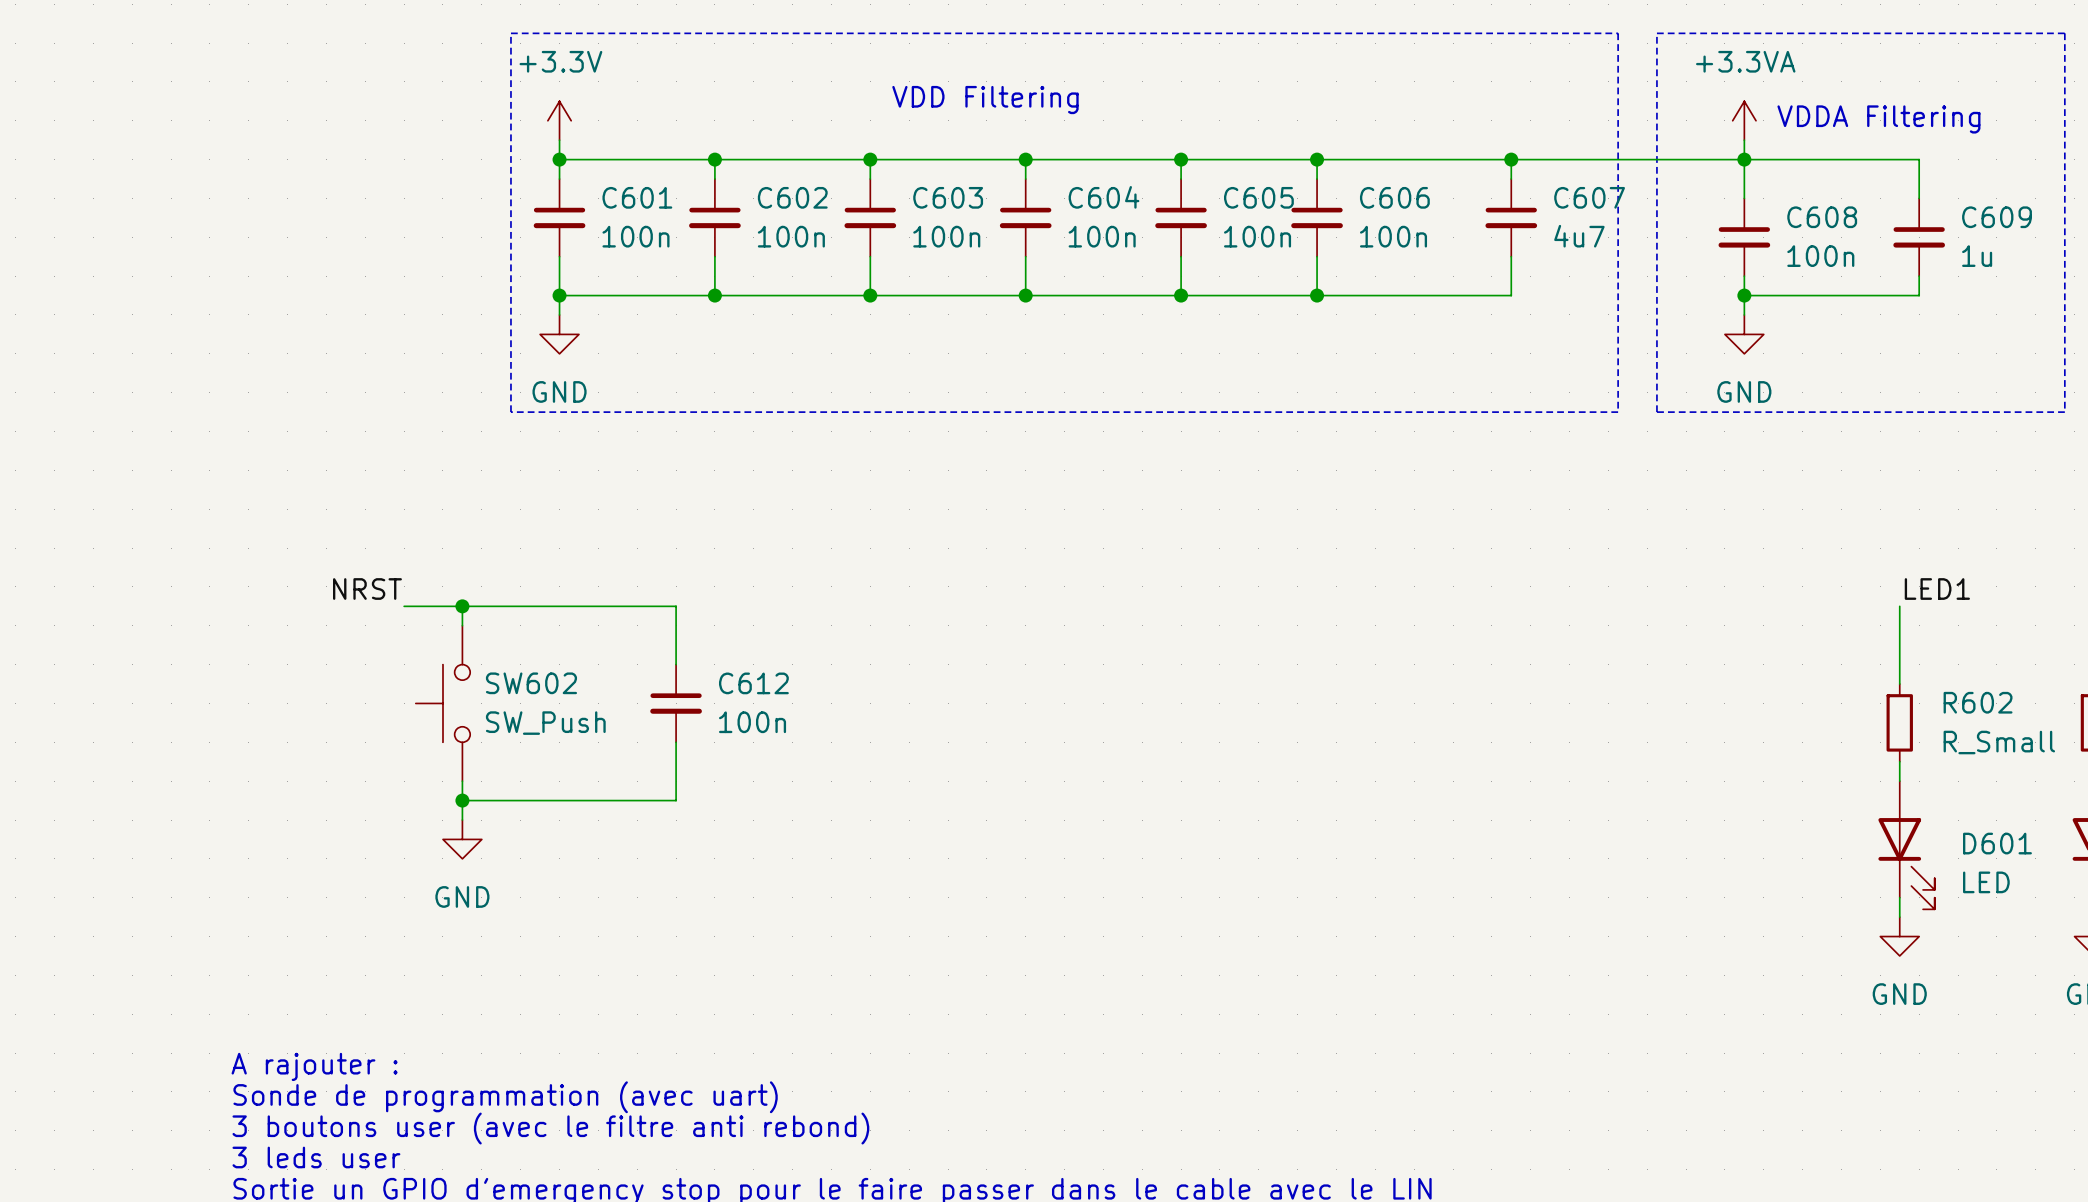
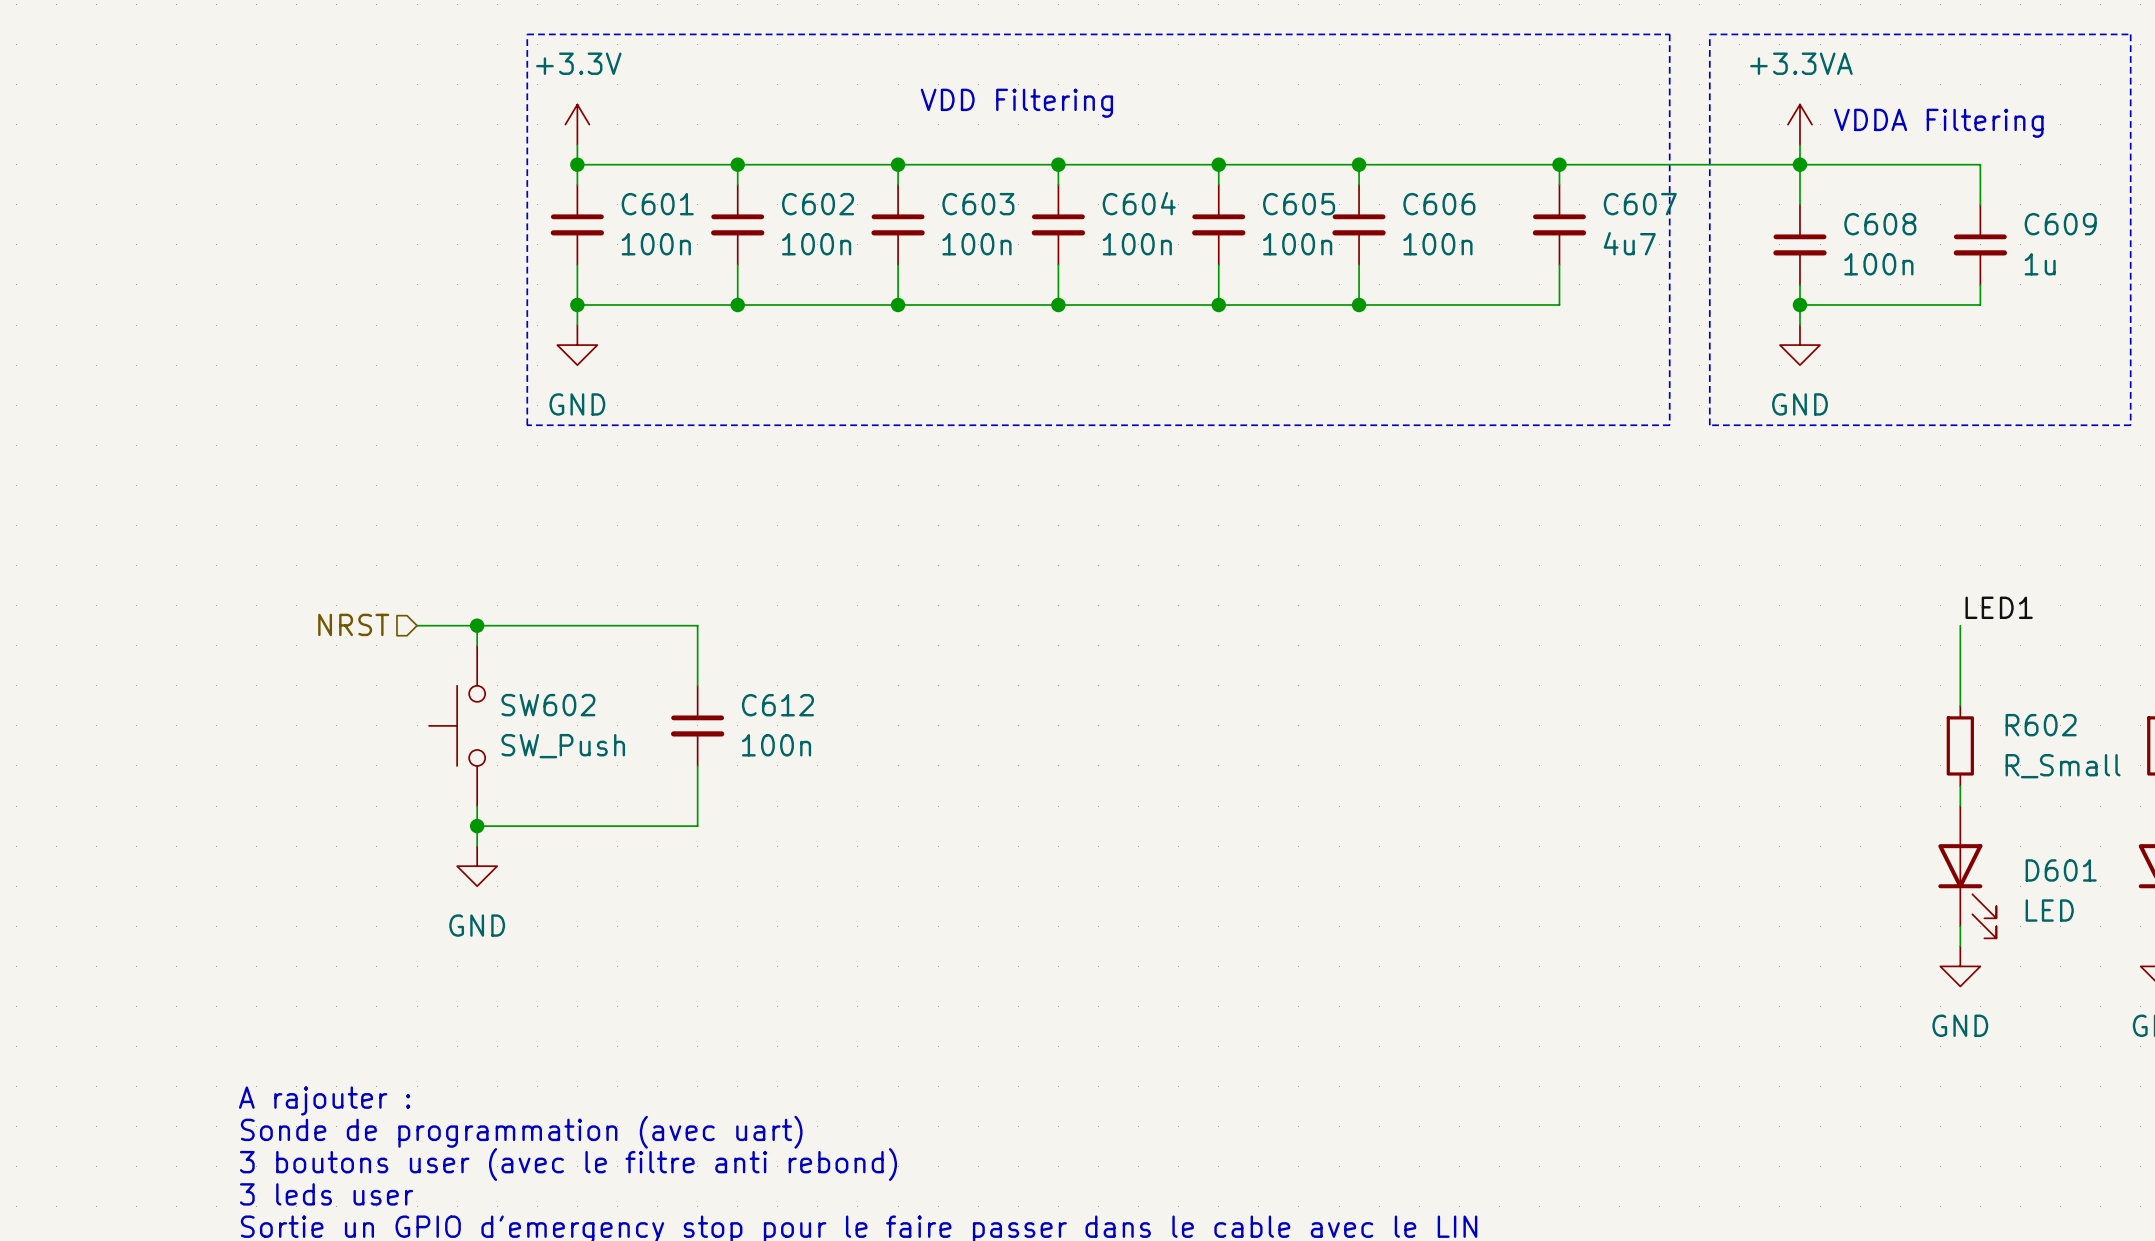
label: NRST (367, 589) -> none
hierarchical label: none -> NRST (353, 624)

